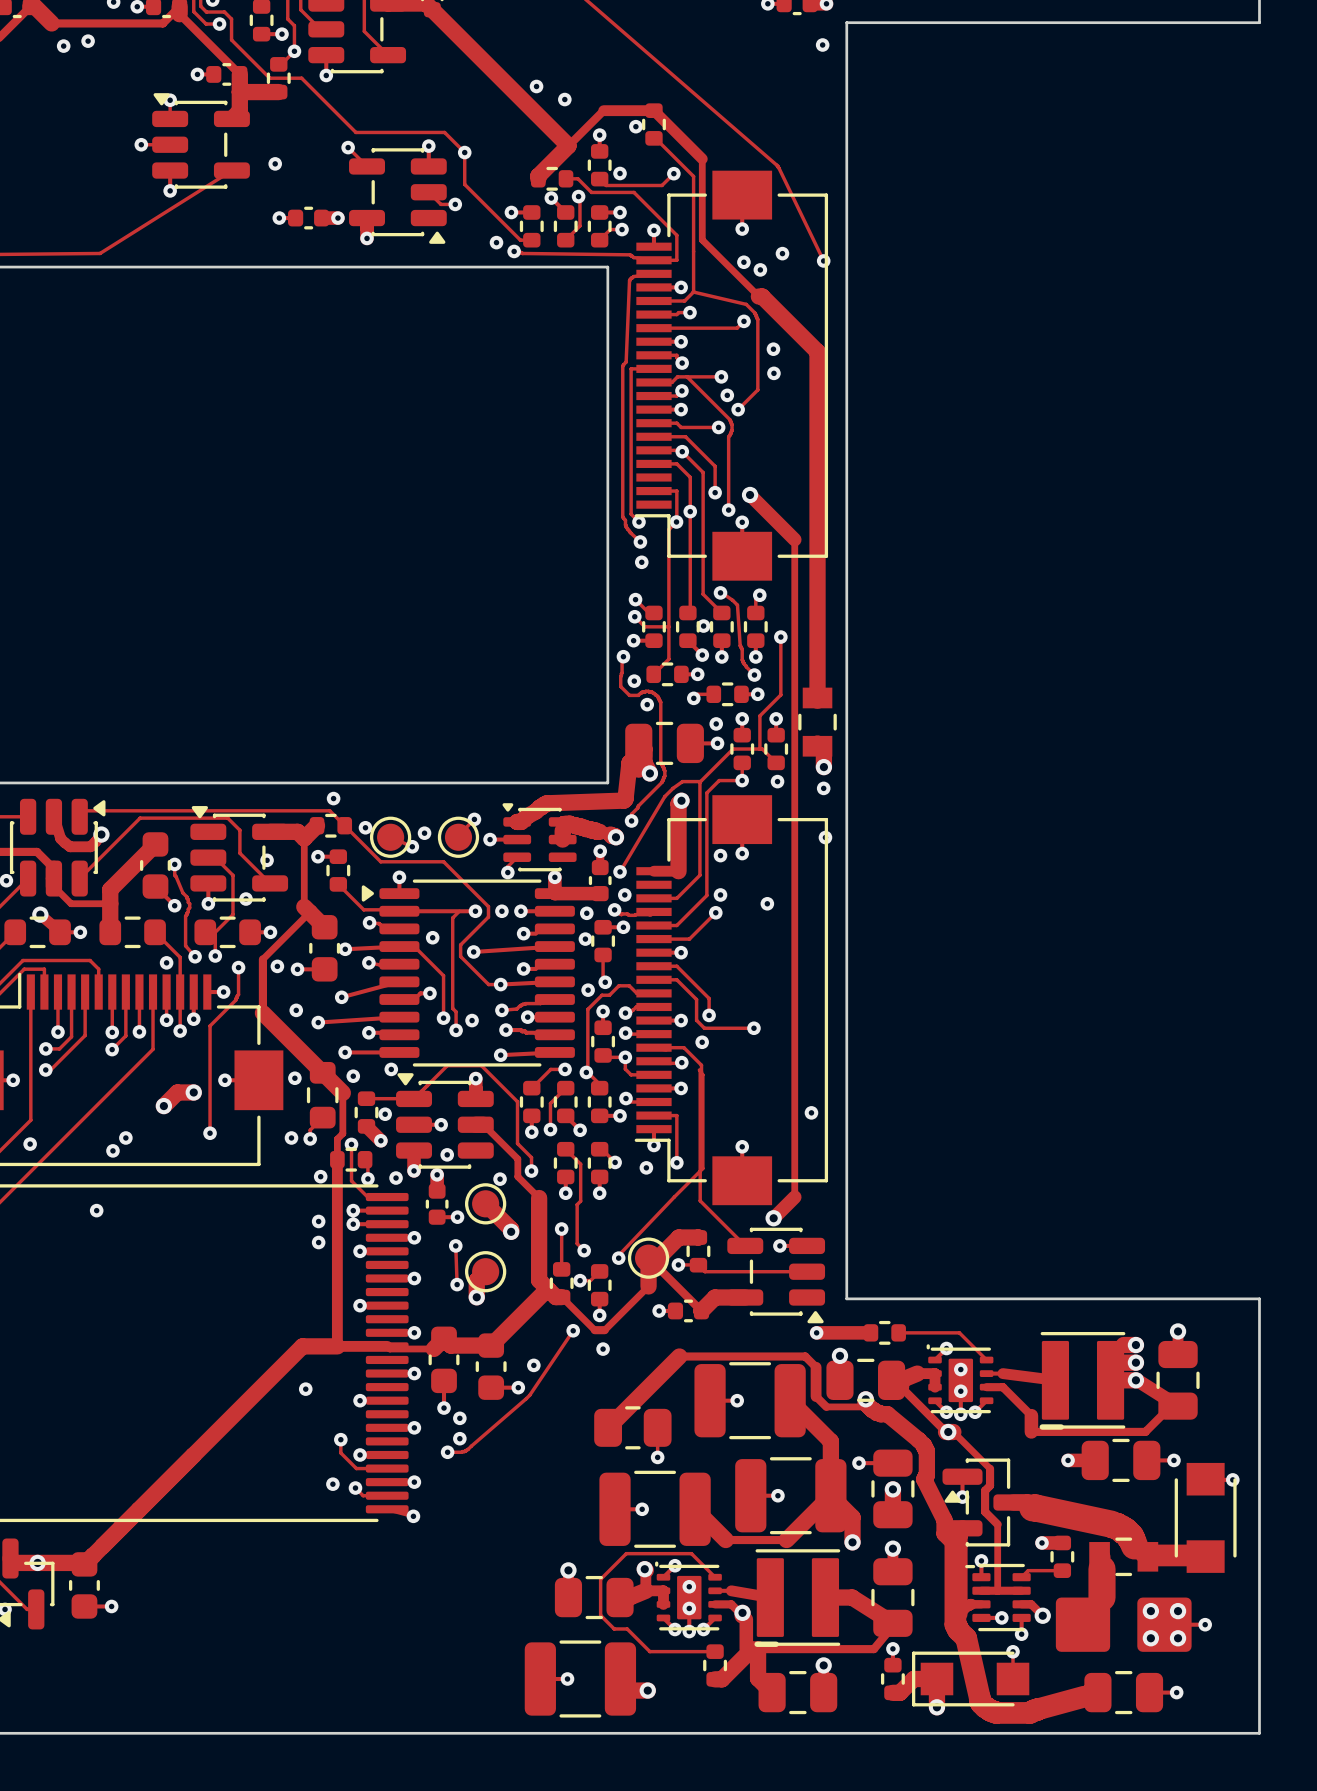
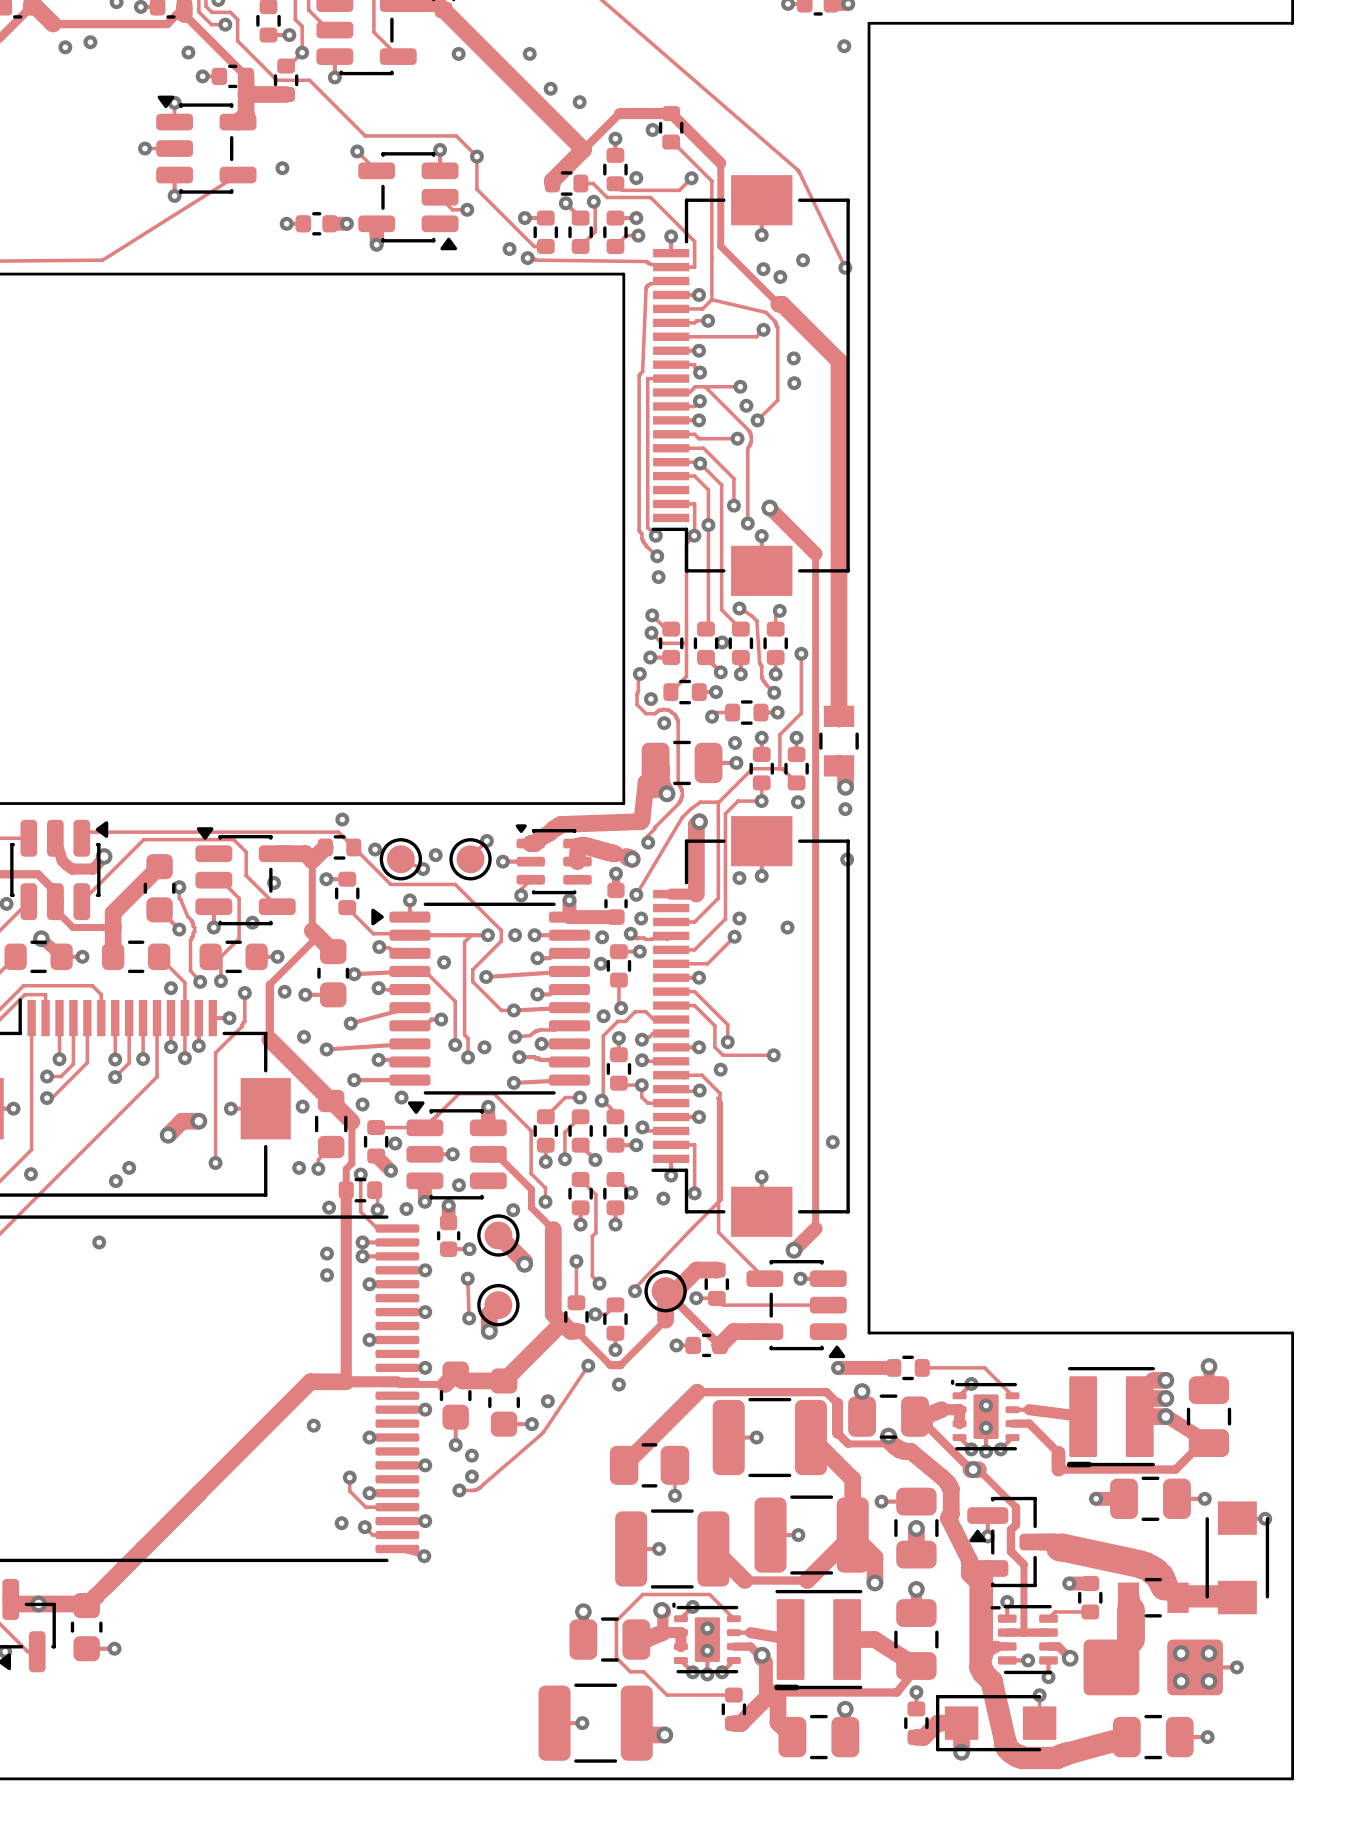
via: none -> (188, 52)
via: none -> (458, 53)
via: none -> (529, 53)

